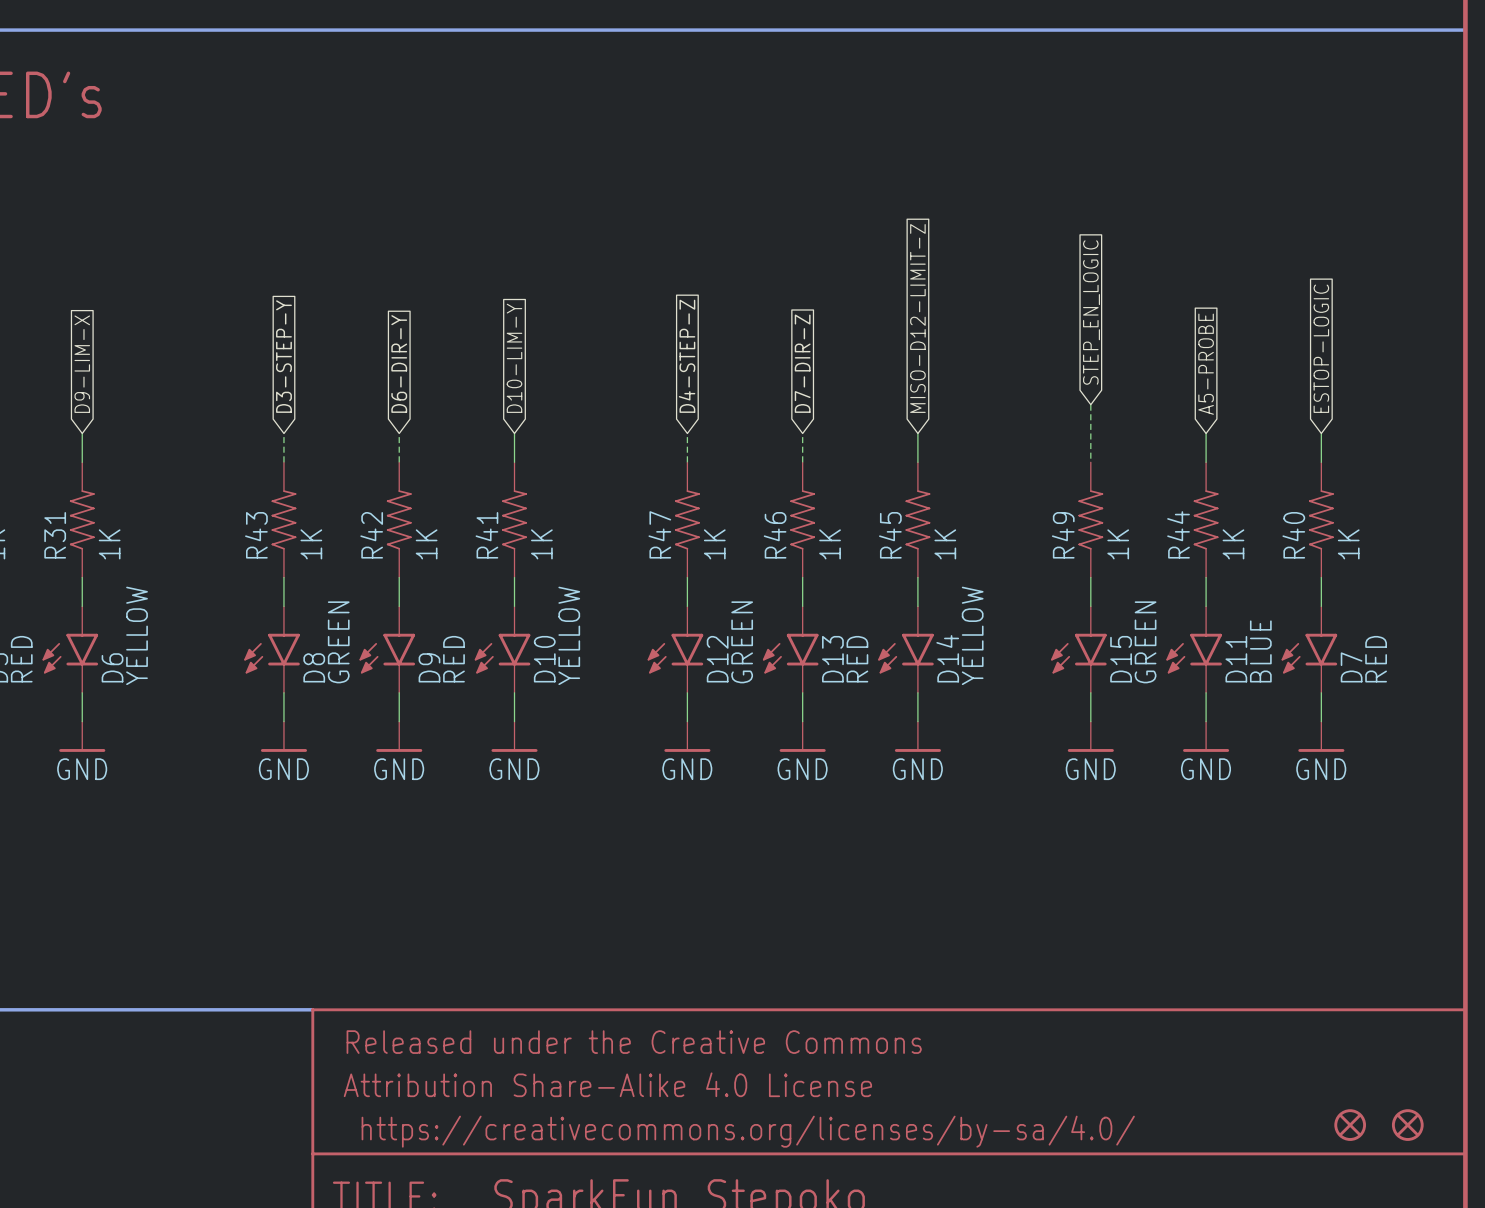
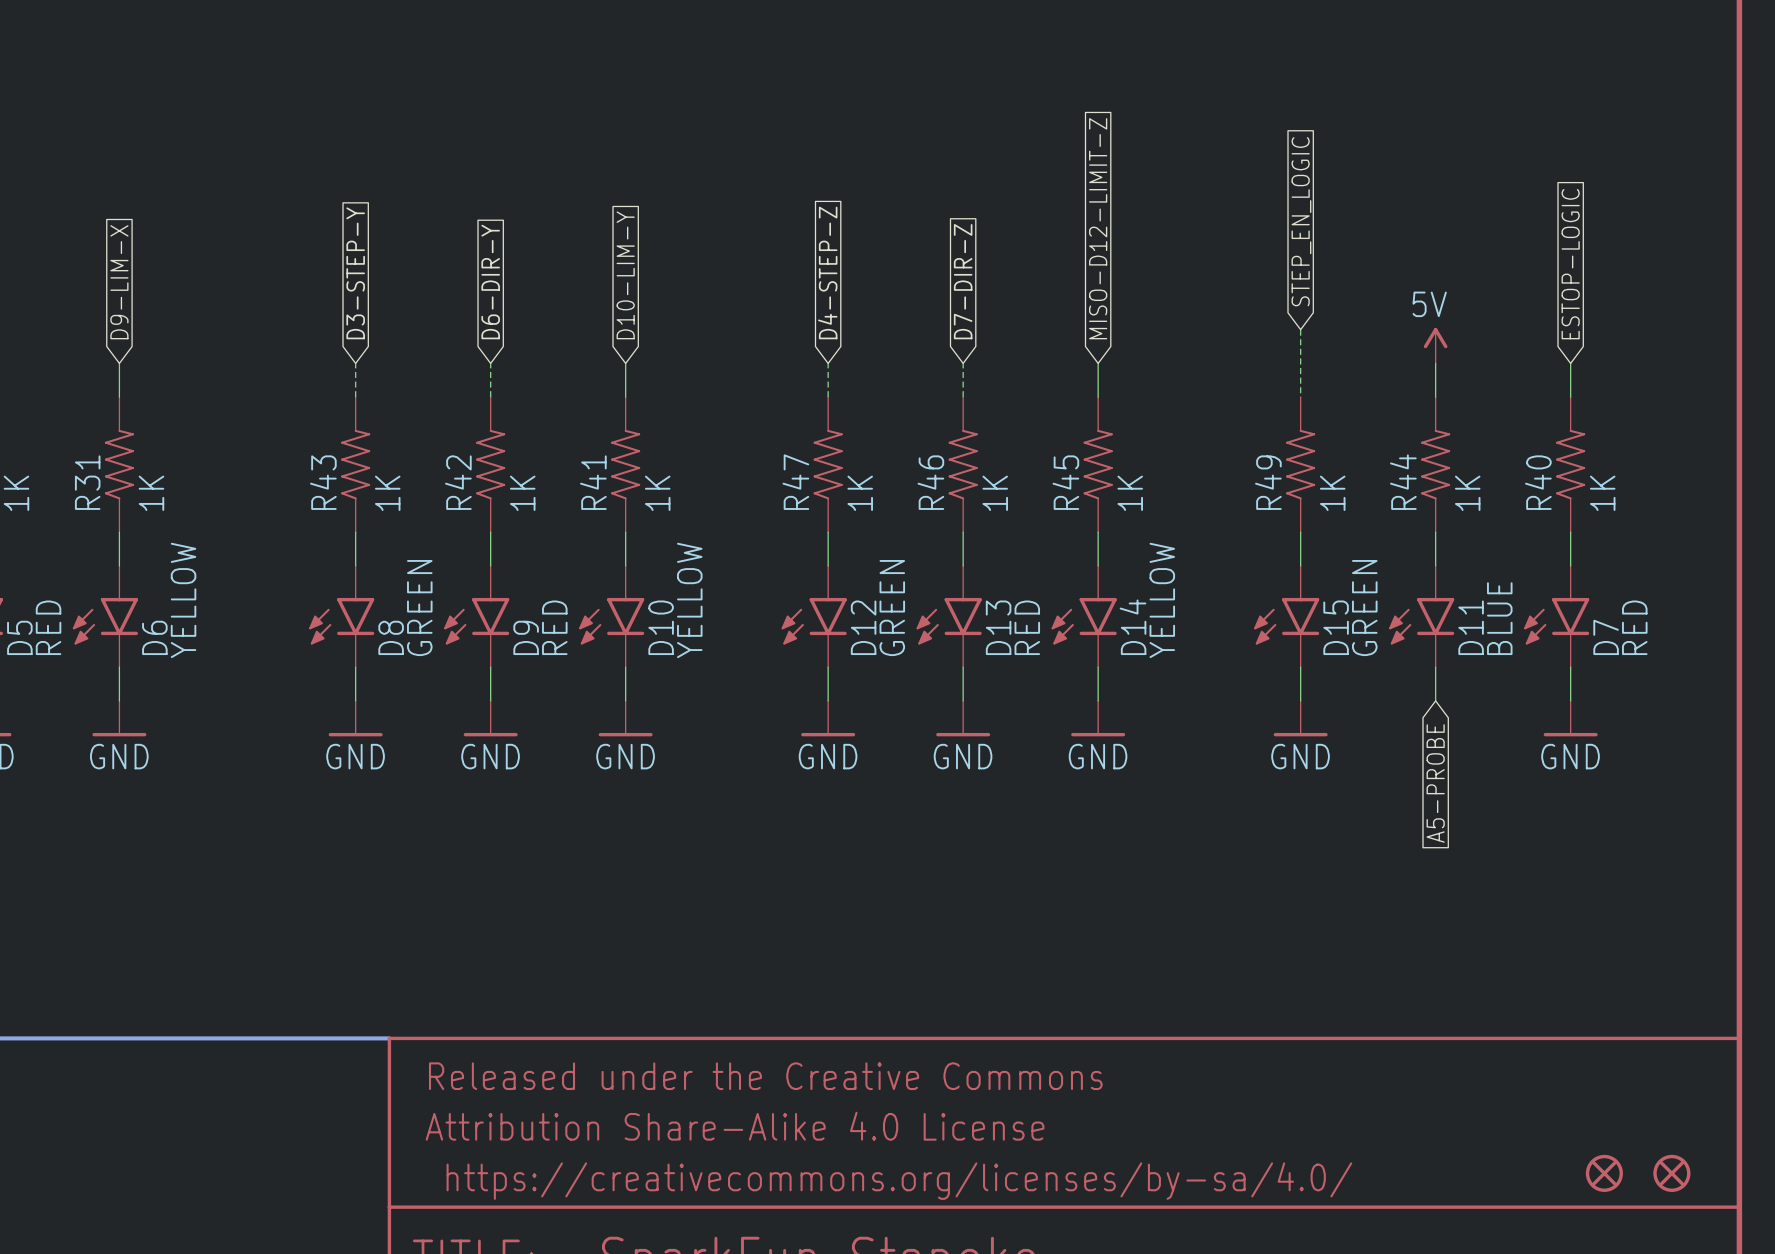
global label: A5-PROBE (1206, 364) -> none
power symbol: none -> 5V (1435, 345)
power symbol: GND (1206, 736) -> none
global label: none -> A5-PROBE (1435, 783)

